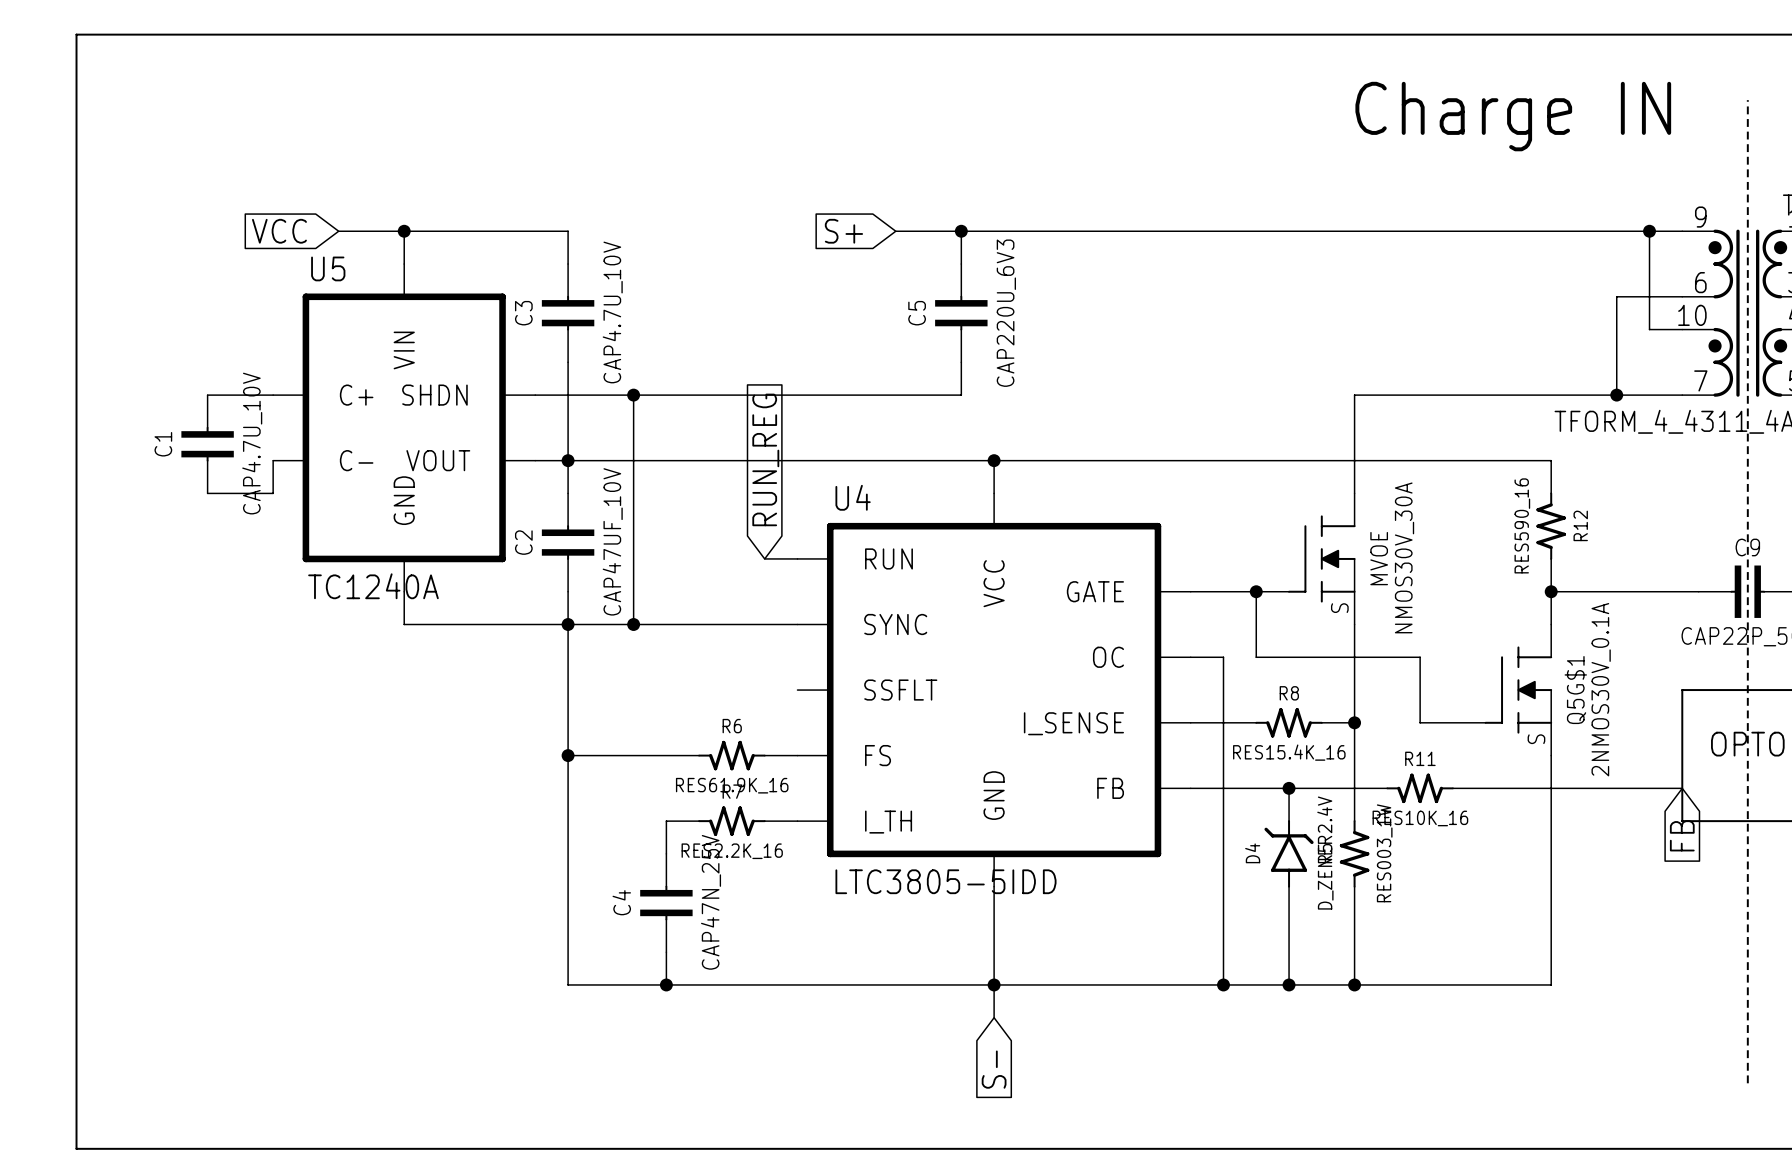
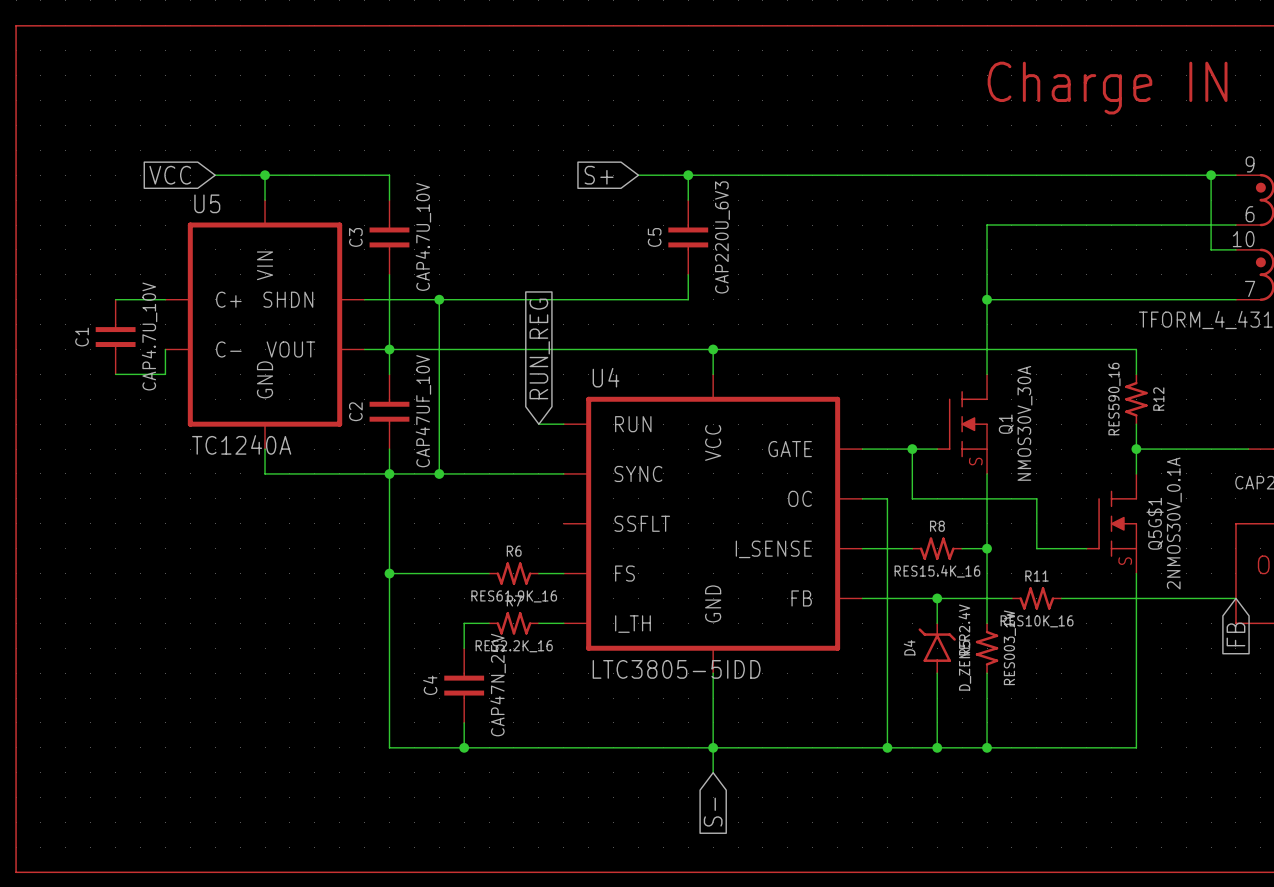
wire: (1616, 296) (1616, 395) -> (1186, 225) (987, 225) (987, 299)
junction: none -> (987, 299)
junction: (1616, 395) -> none
MVOE name: MVOE (1379, 558) -> Q1 (1006, 424)

